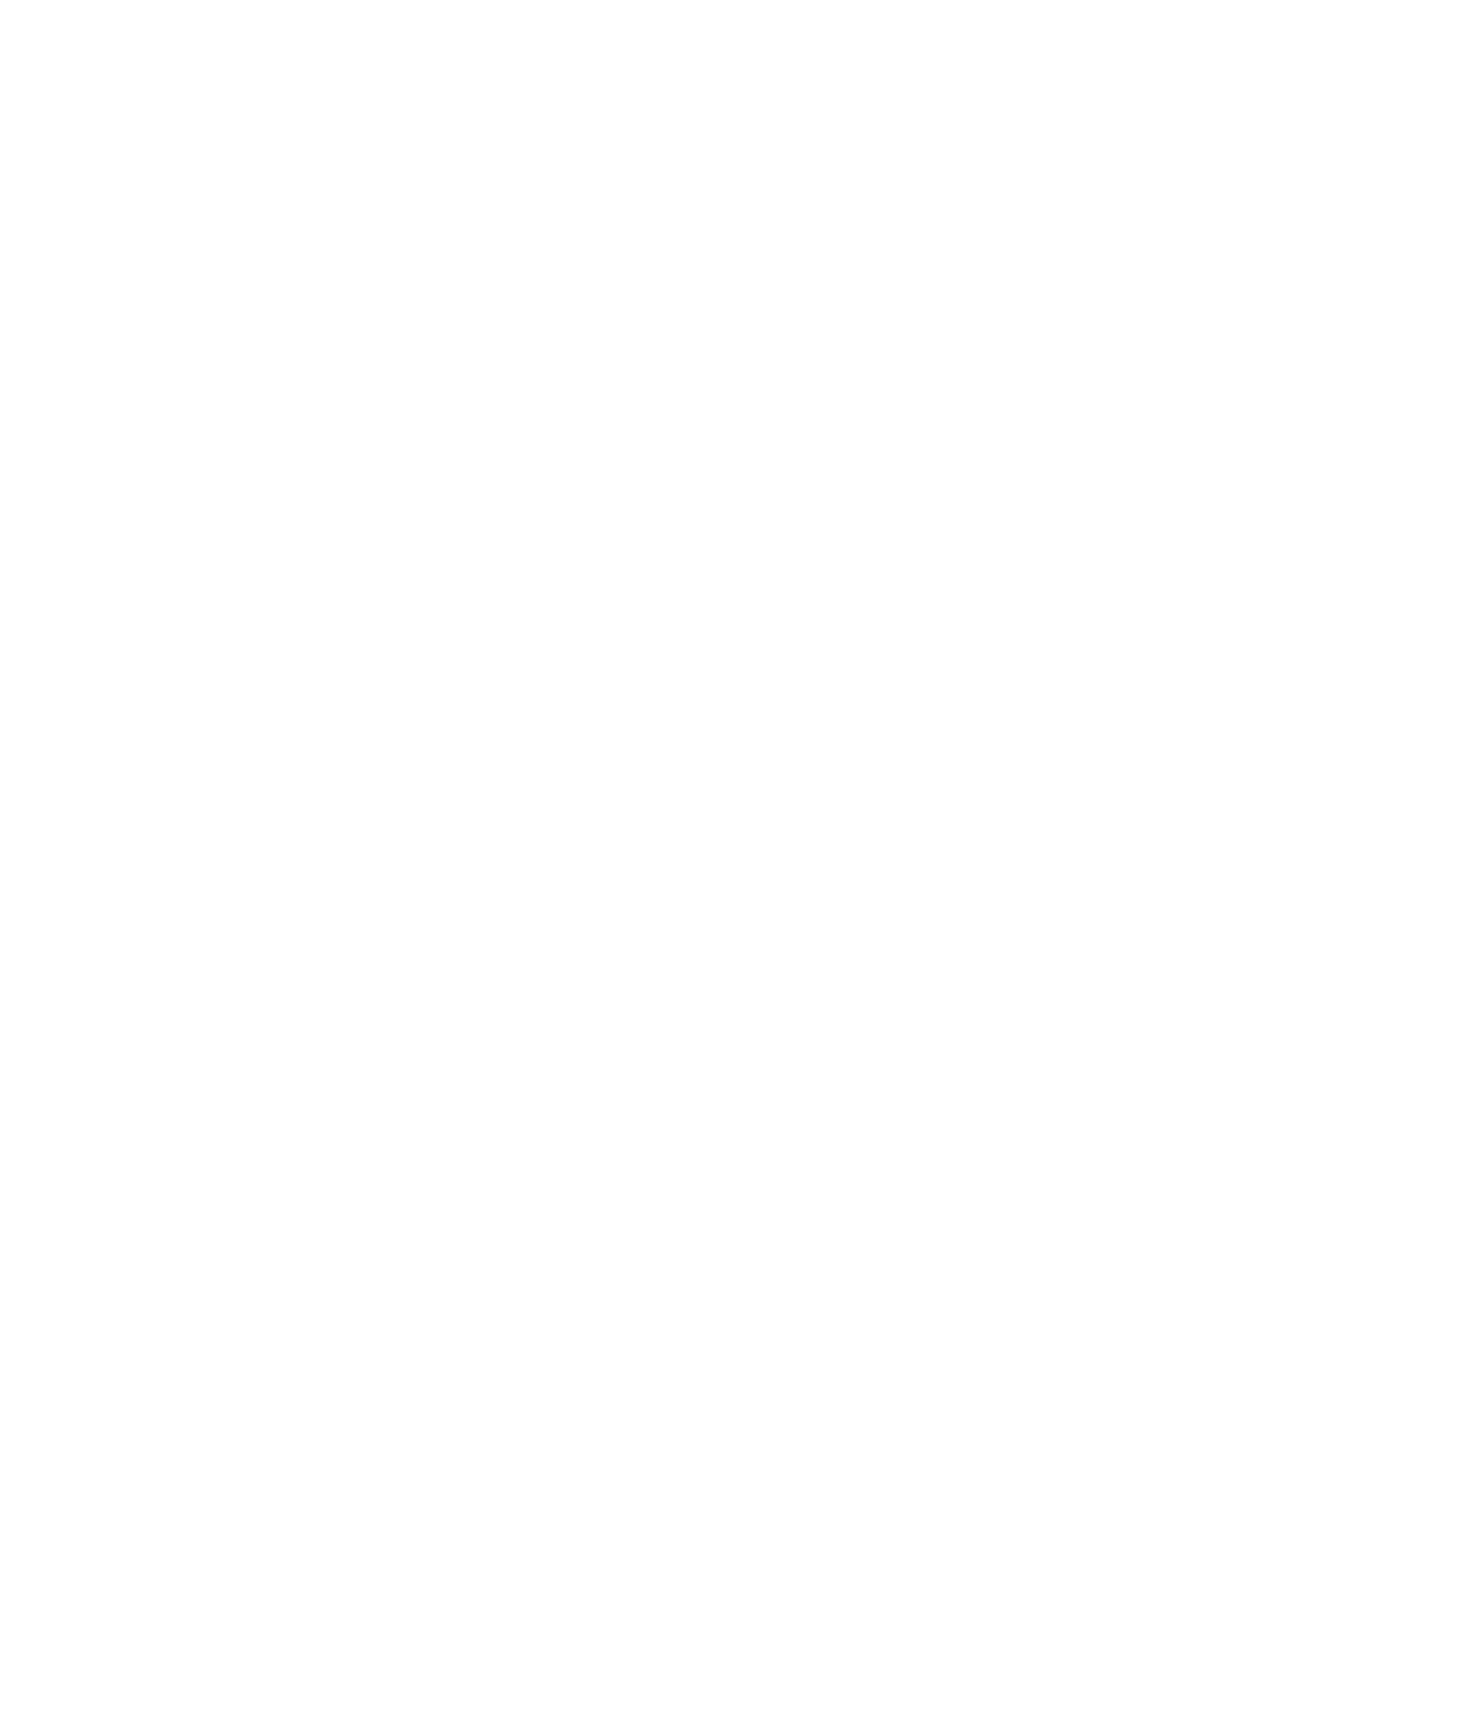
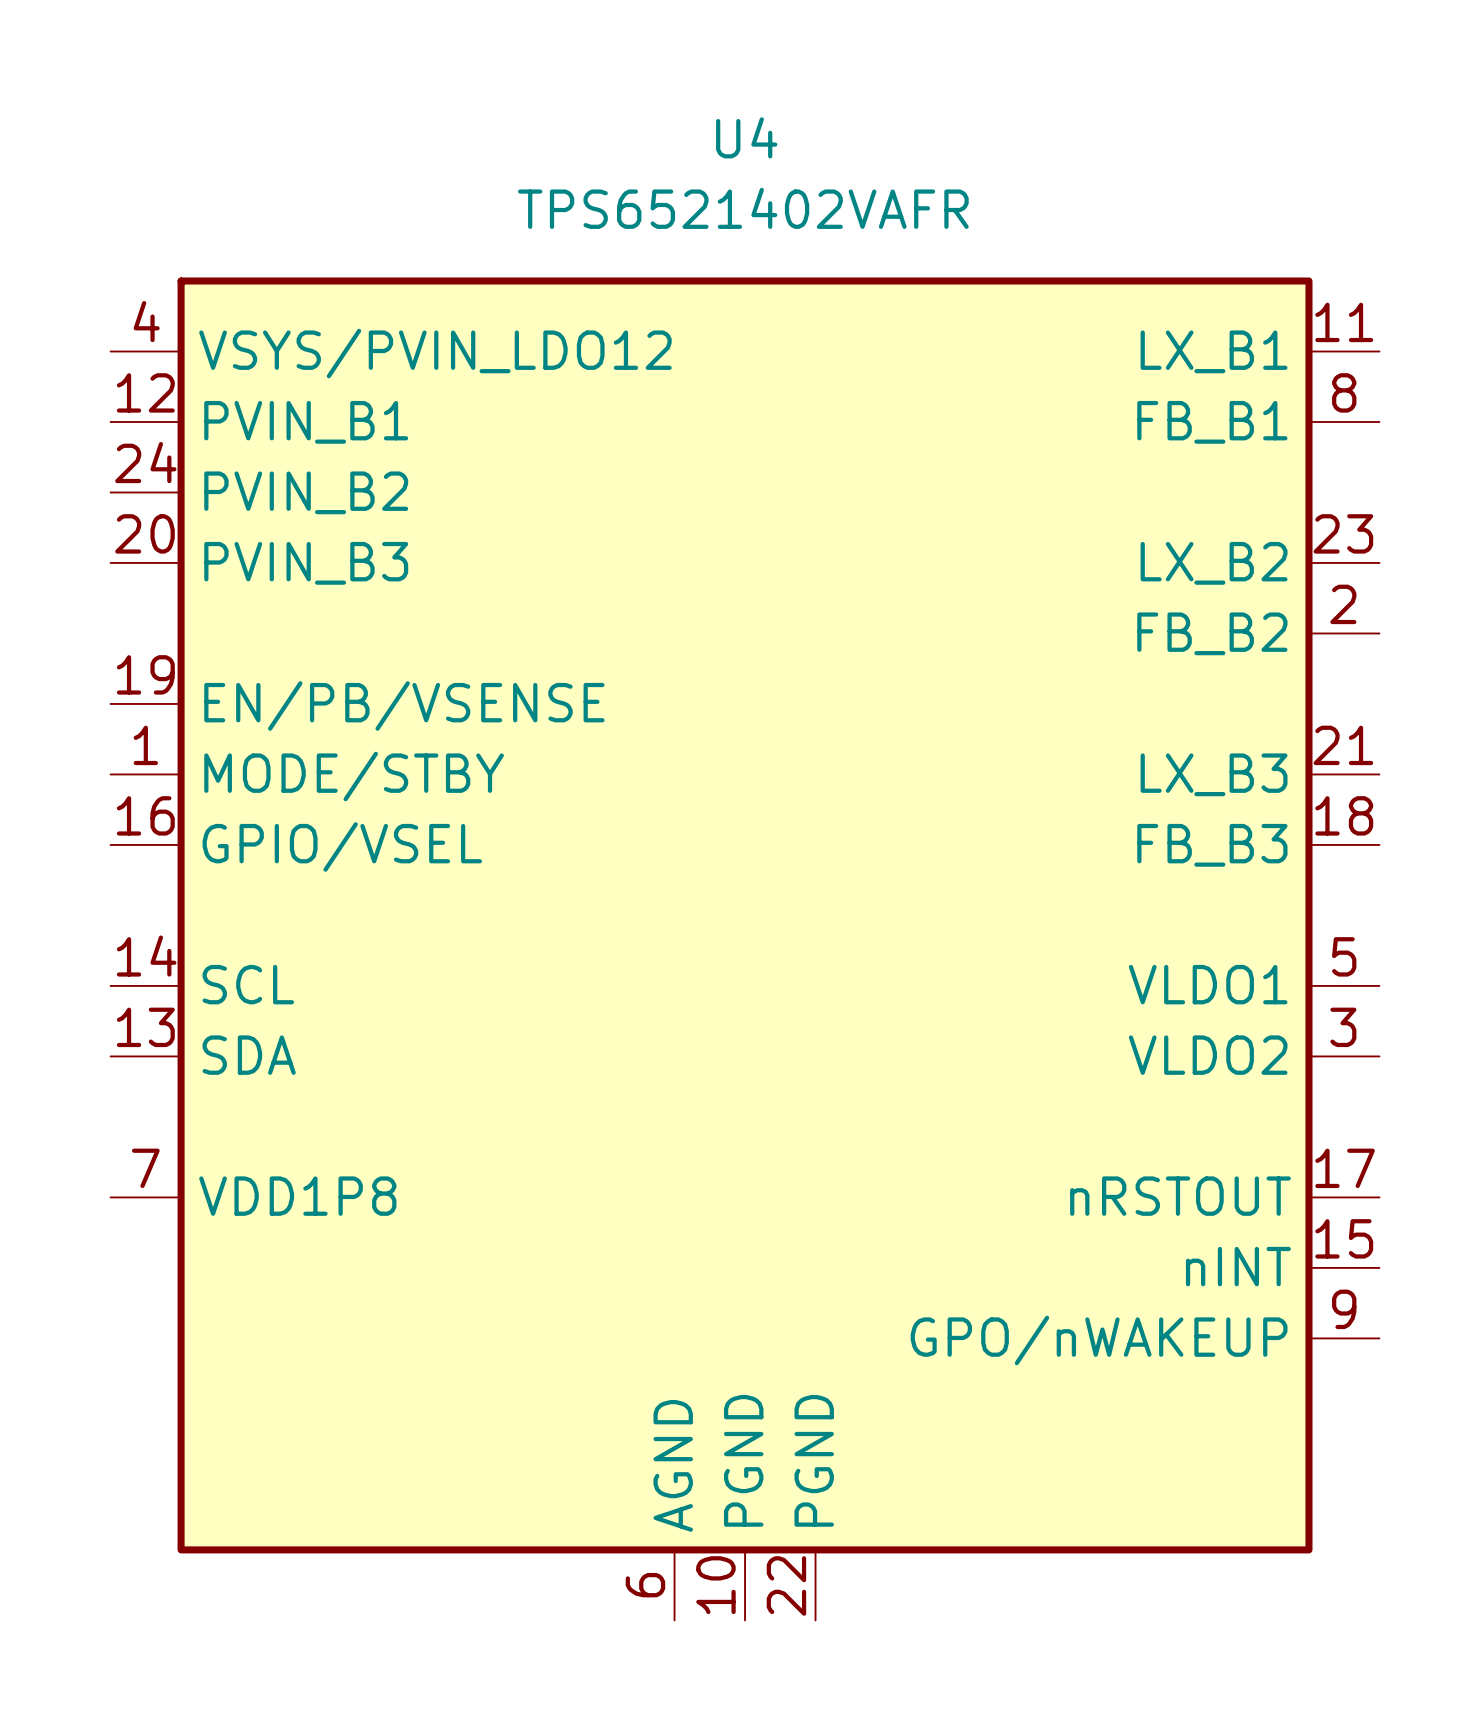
U4: none -> TPS6521402VAFR (745, 948)

